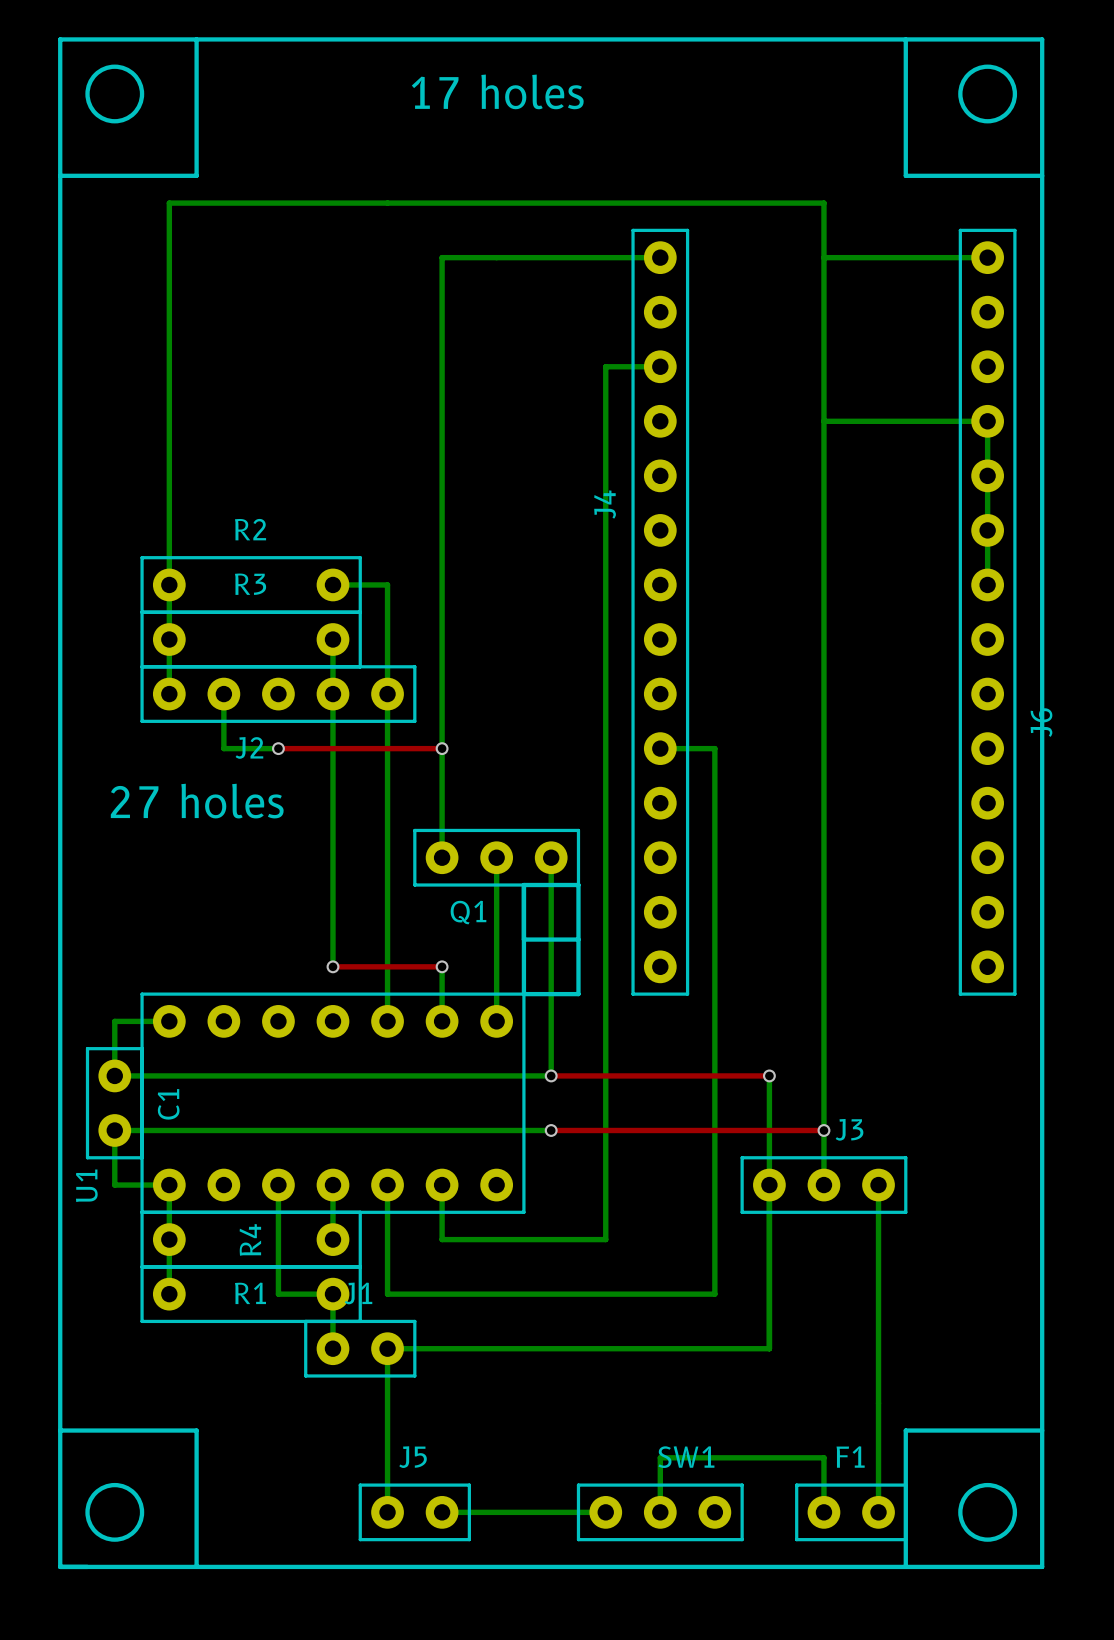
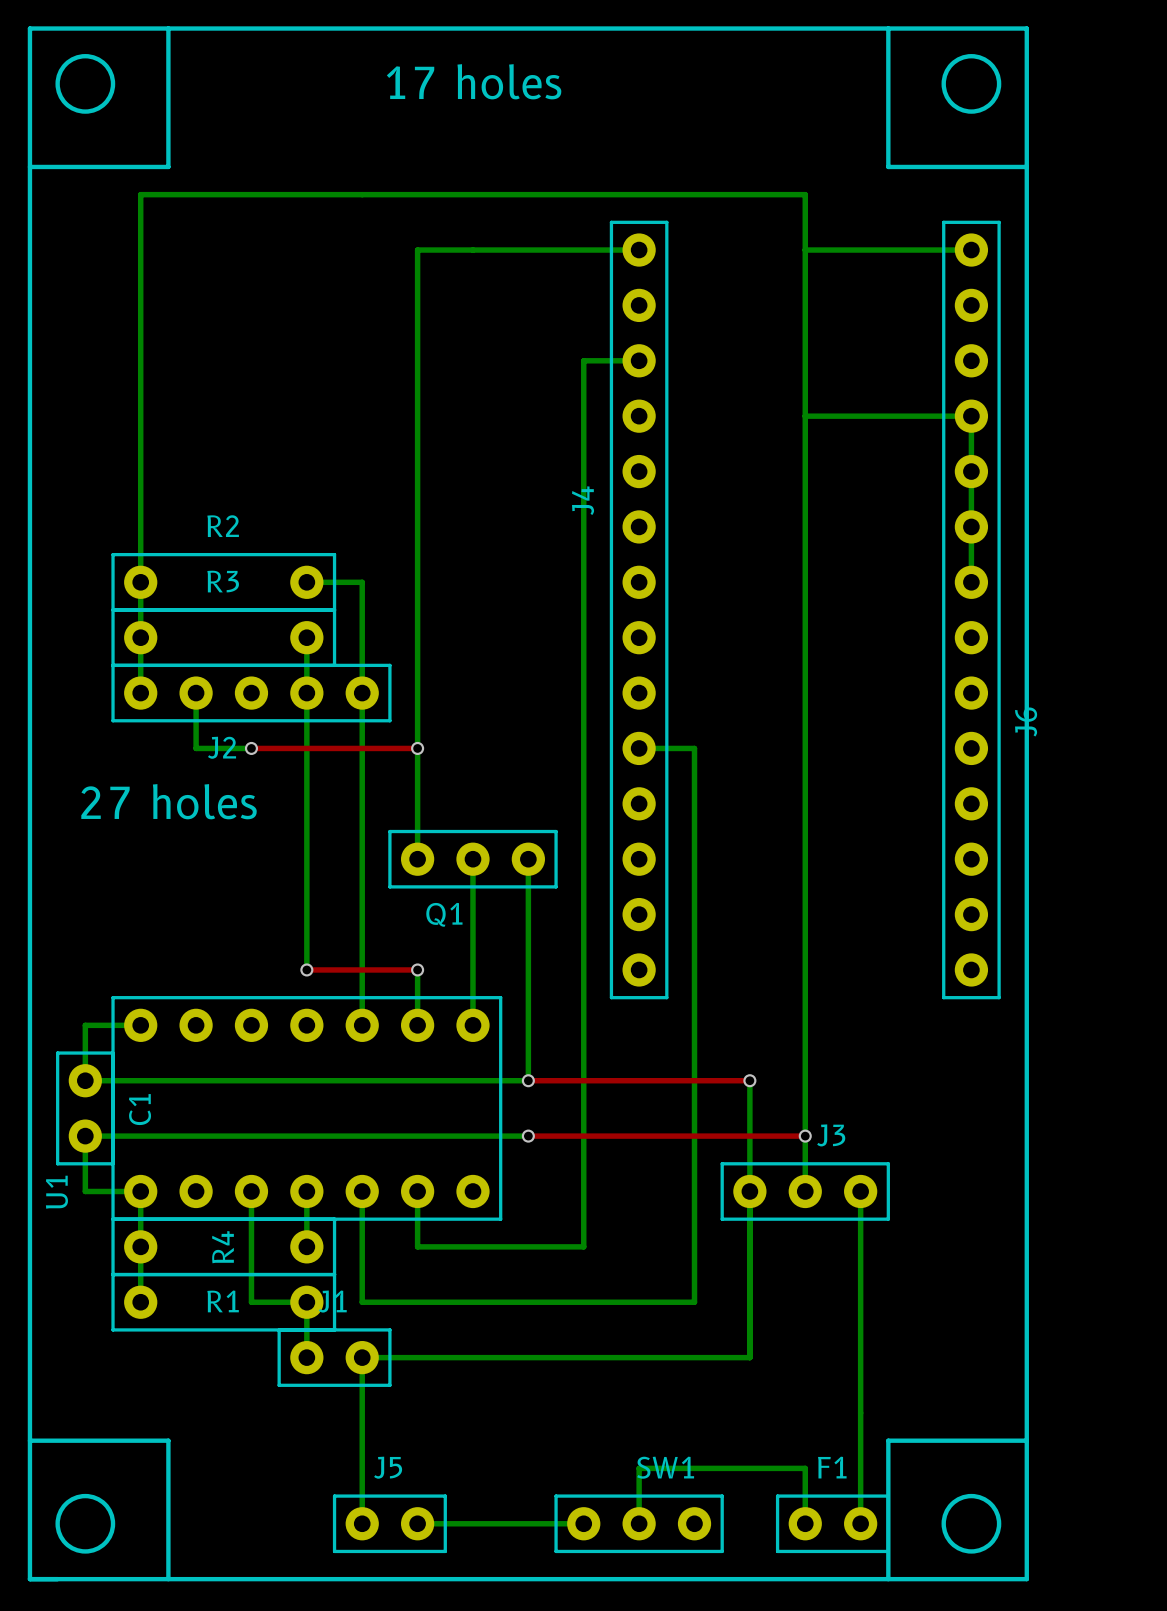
line: (523, 885) (523, 994) (578, 994) (578, 885) (523, 885) -> none
line: (523, 939) (578, 939) -> none

